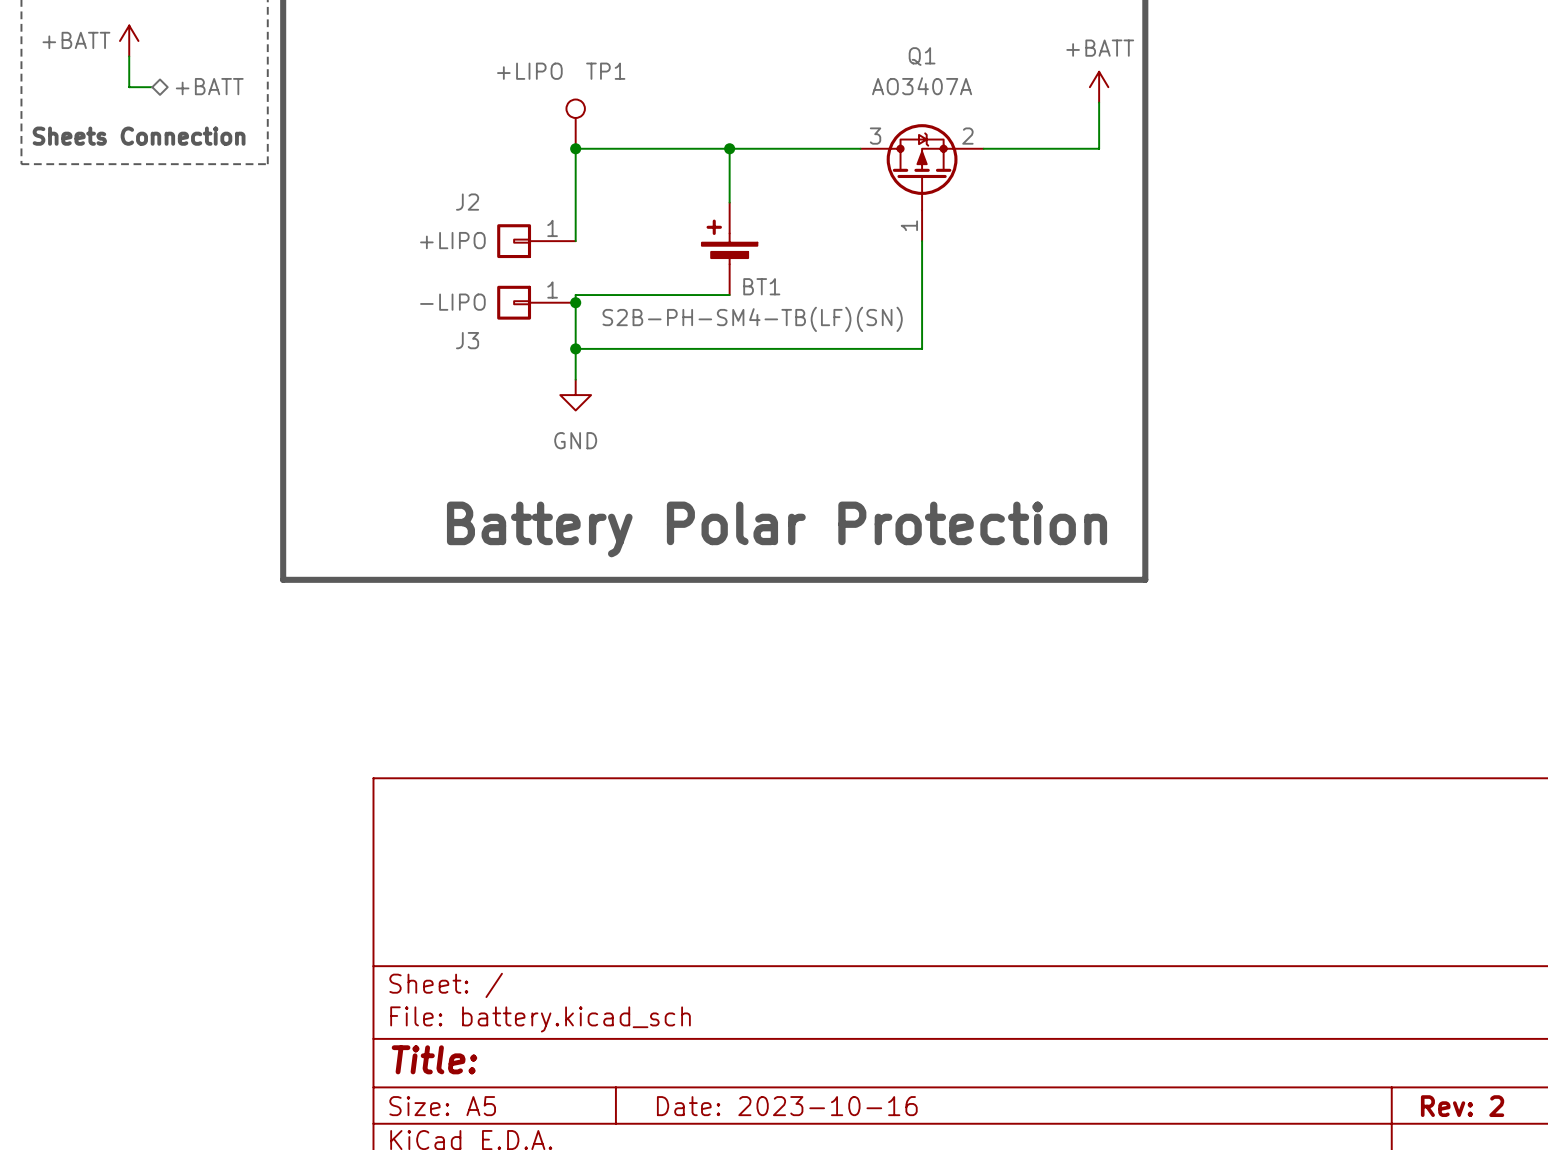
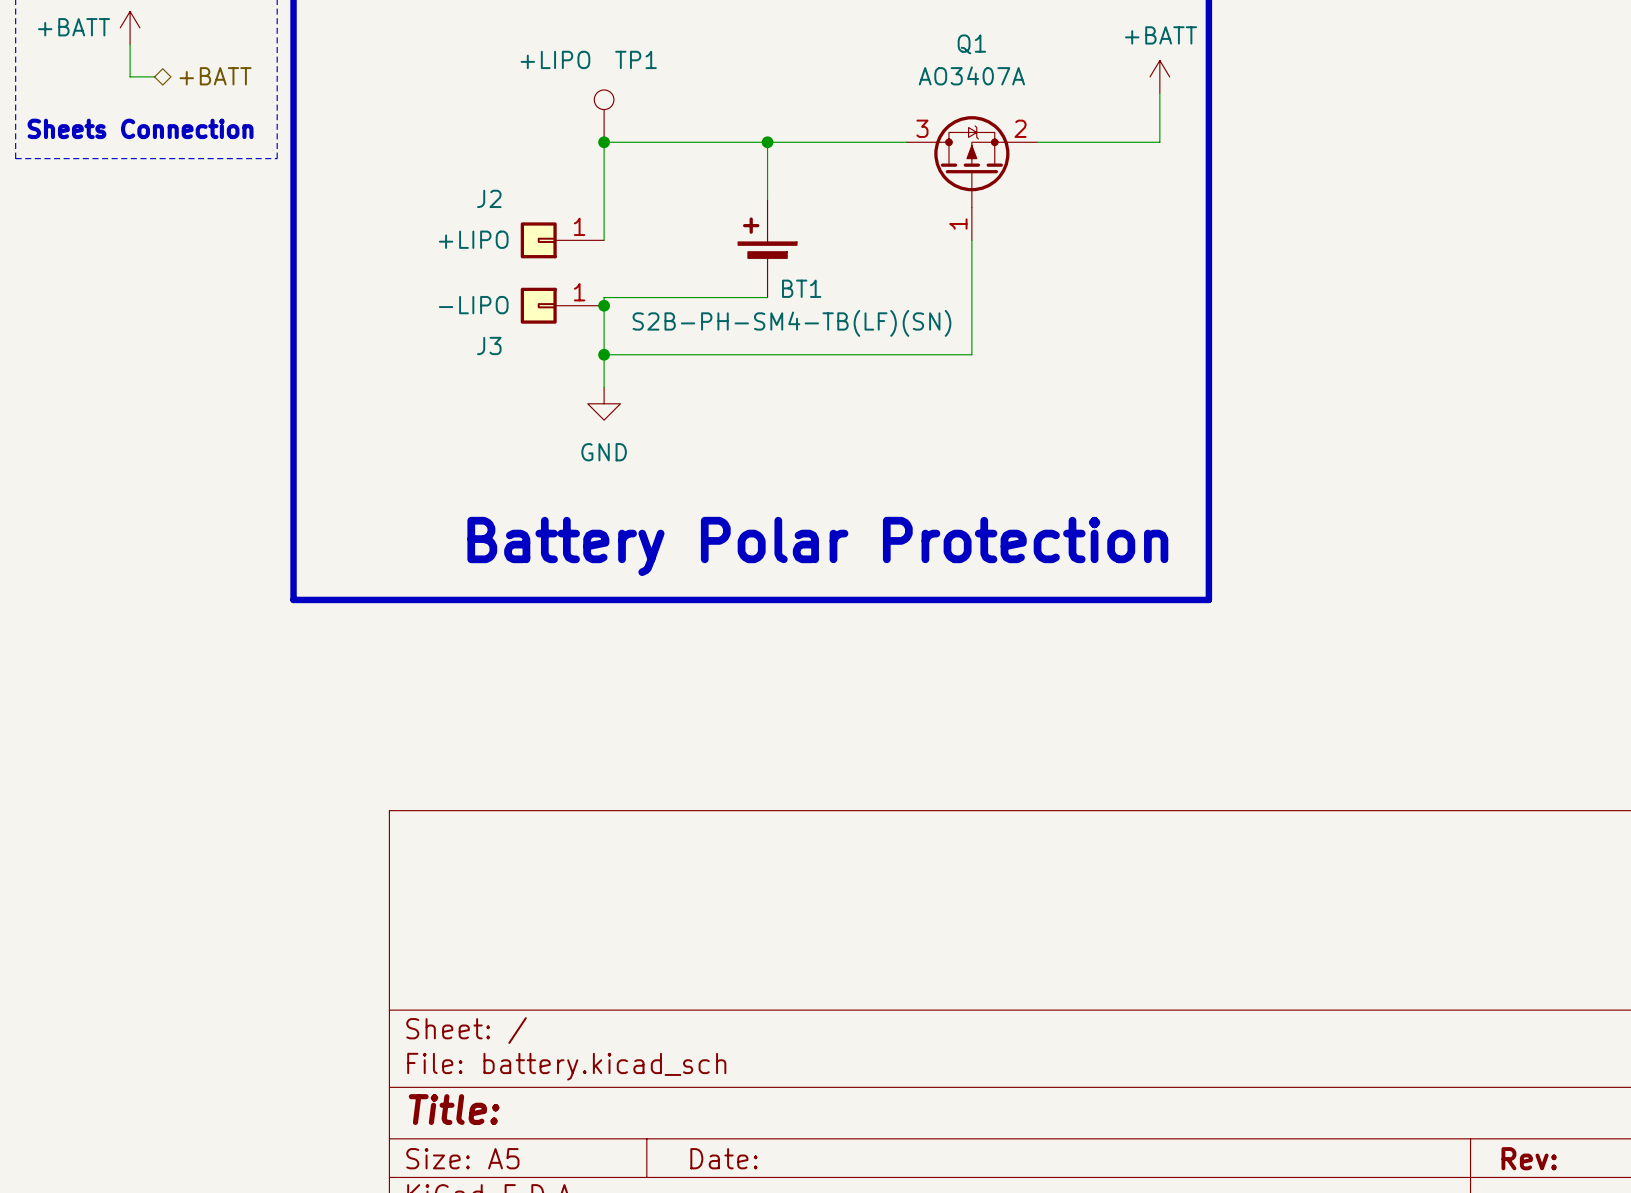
title block: Date: 2023-10-16 (787, 1106) -> Date: (723, 1158)
title block: Rev: 2 (1462, 1106) -> Rev: (1529, 1158)

